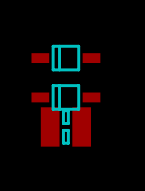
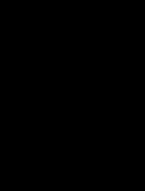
part: (65, 58) -> none
part: (65, 97) -> none
part: (65, 117) -> none
part: (65, 136) -> none

